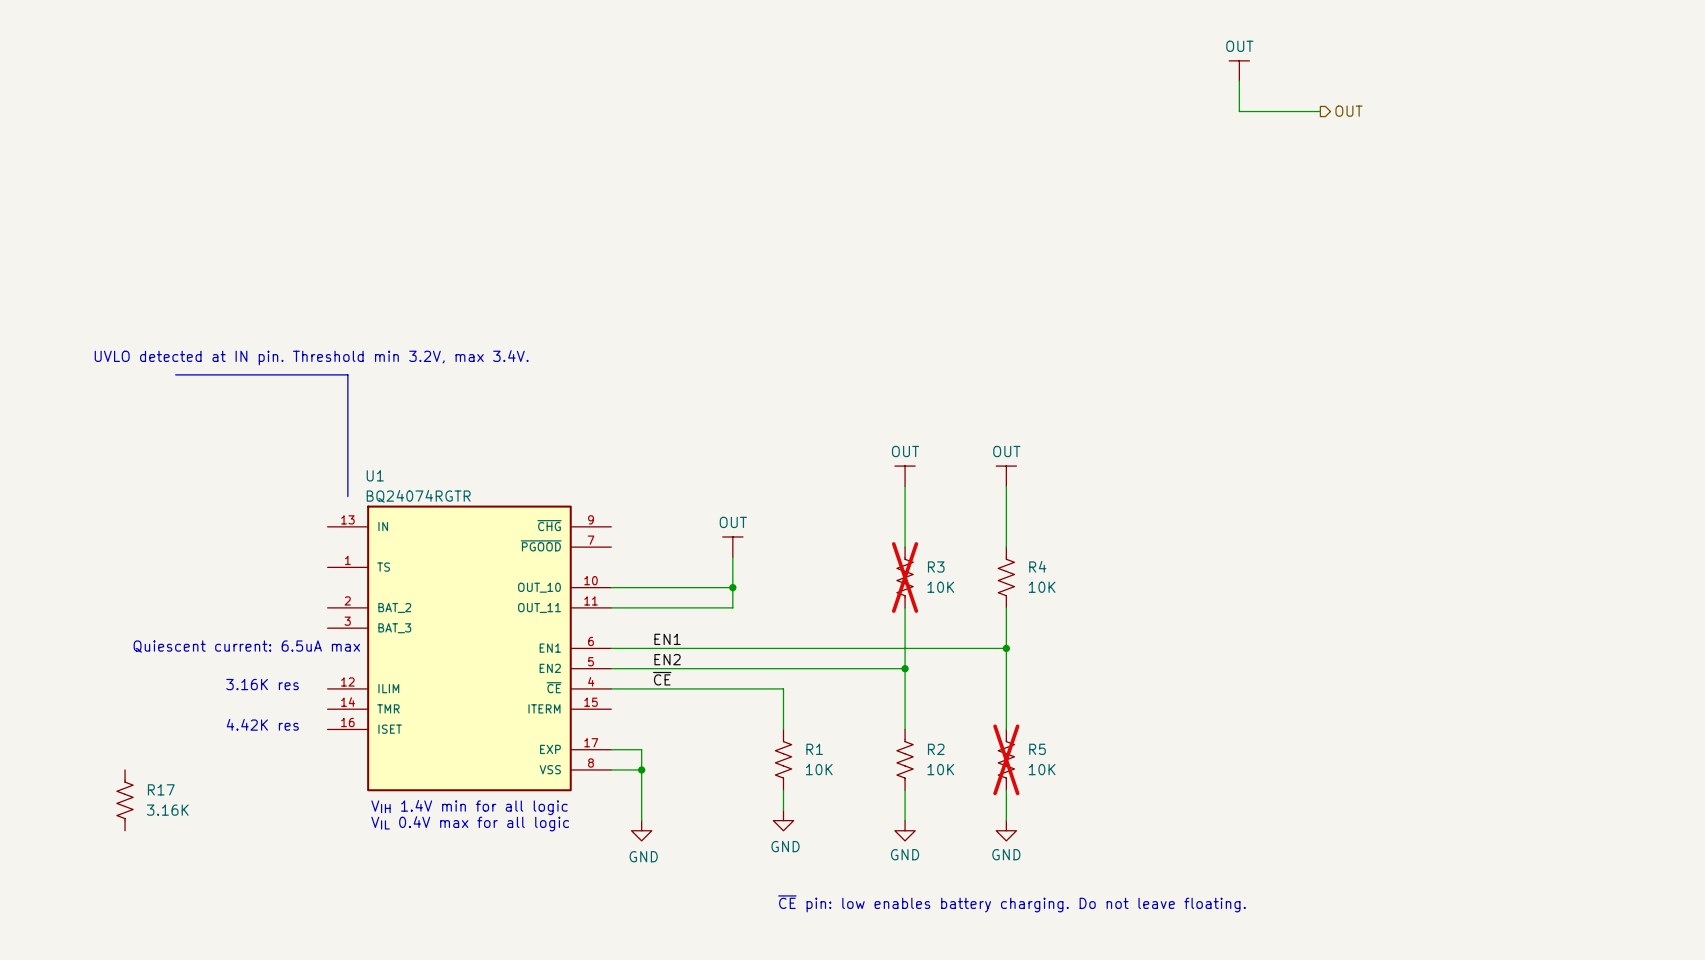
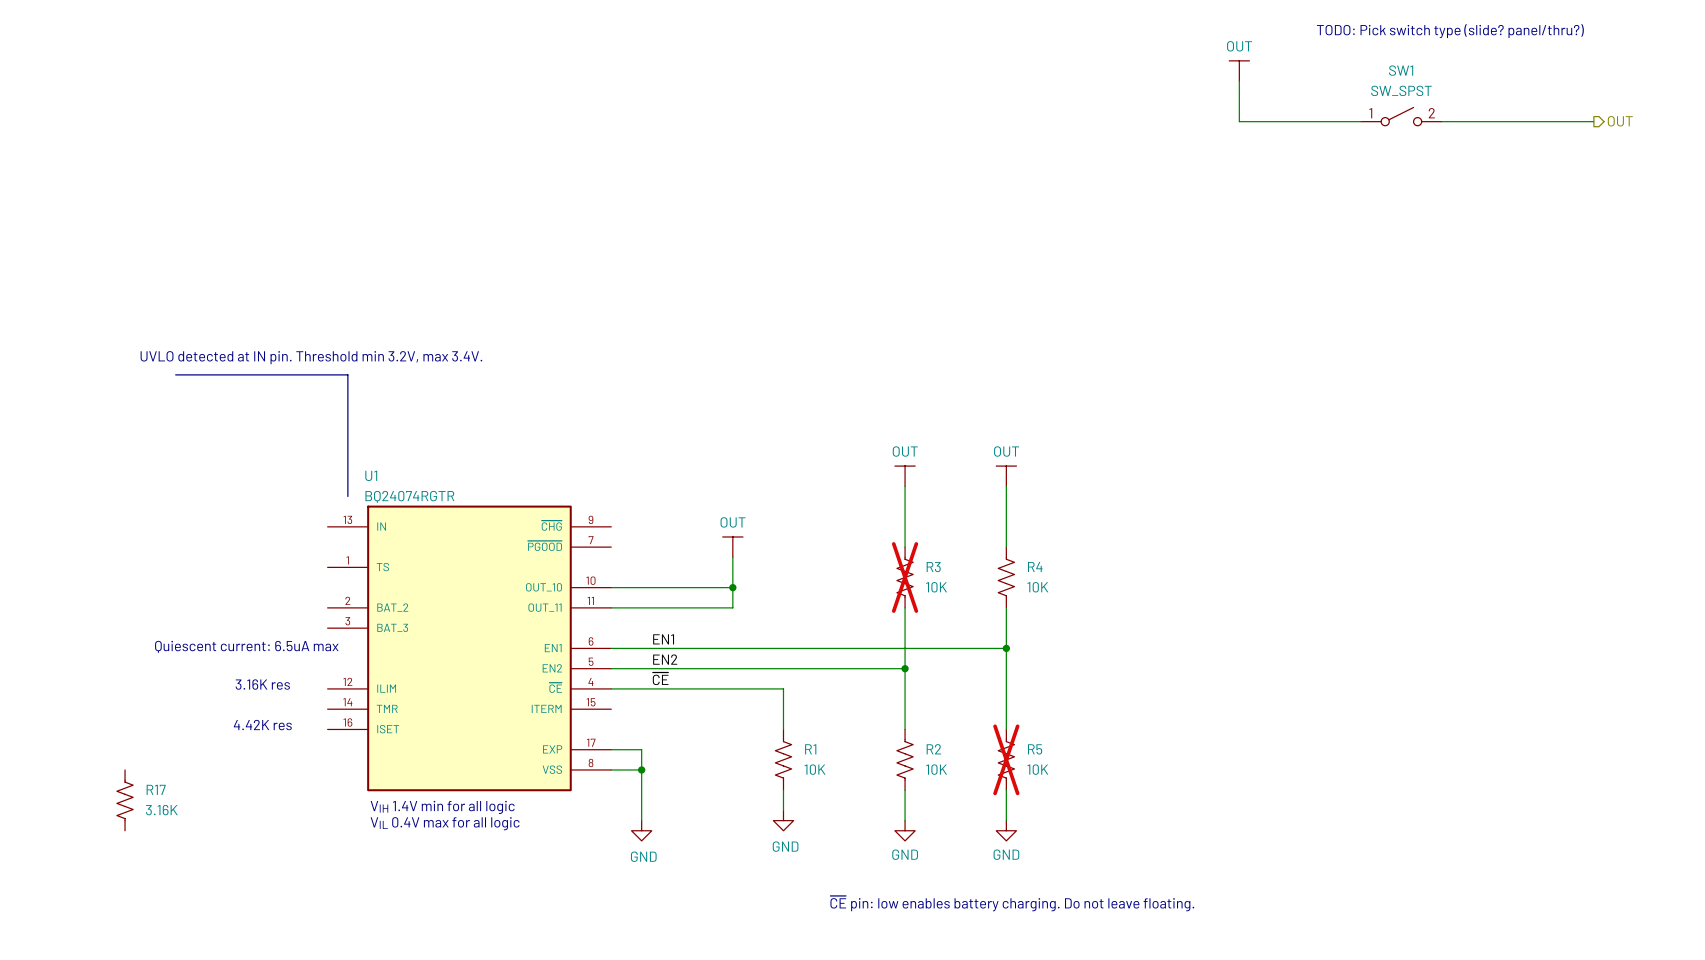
text: none -> TODO: Pick switch type (slide? panel/thru?) (1450, 31)
wire: (1239, 111) (1320, 111) -> (1239, 111) (1239, 121) (1360, 121)
hierarchical label: OUT (1349, 111) -> none
SW1: none -> SW_SPST (1401, 116)
wire: none -> (1441, 121) (1593, 121)
hierarchical label: none -> OUT (1620, 121)

